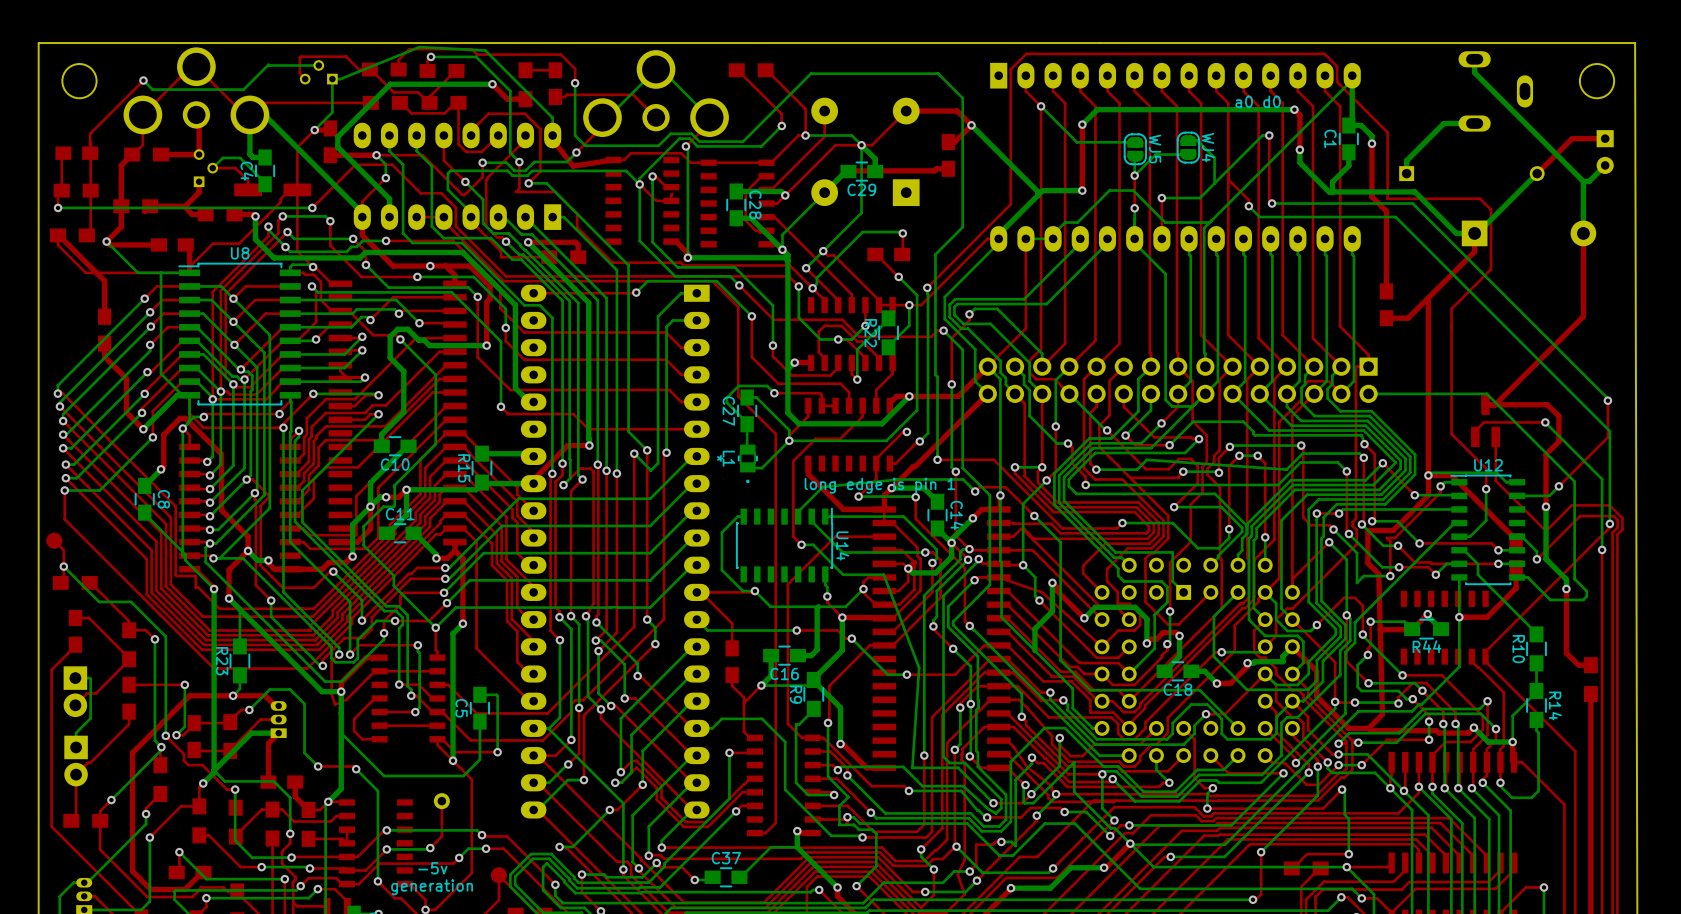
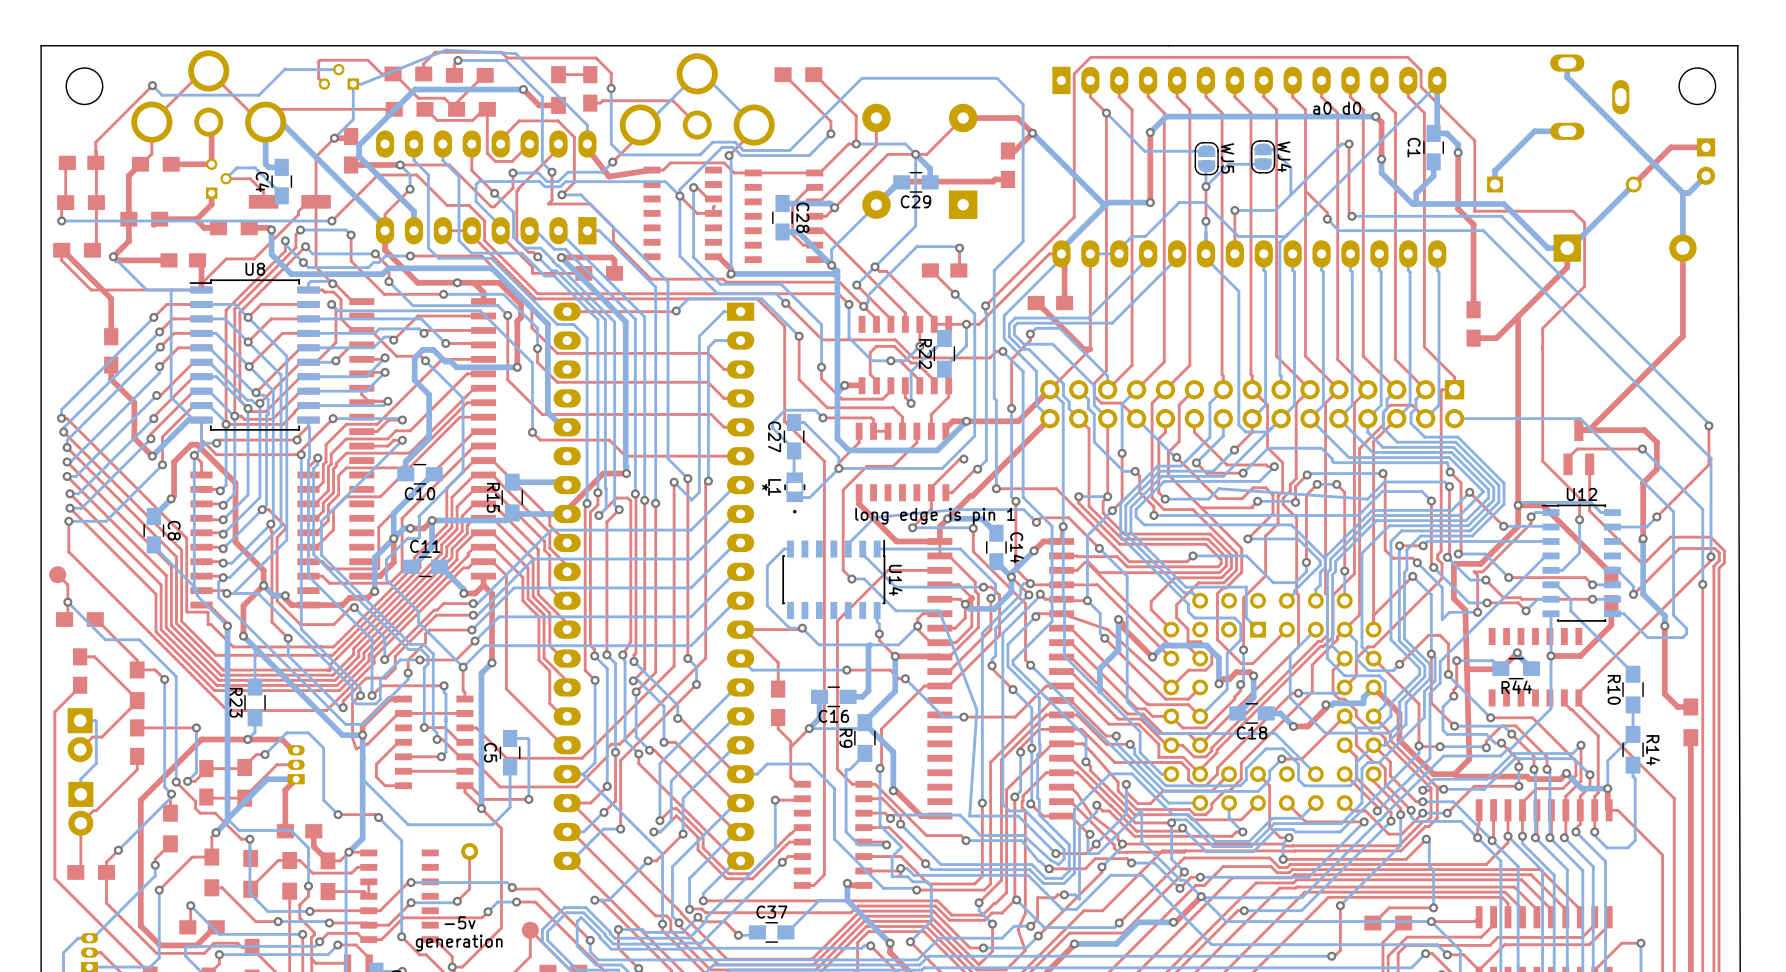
top track: none -> (1061, 253) (1064, 257) (1064, 303)
top track: none -> (1036, 303) (1083, 349) (1090, 349)
part: none -> (1050, 303)

